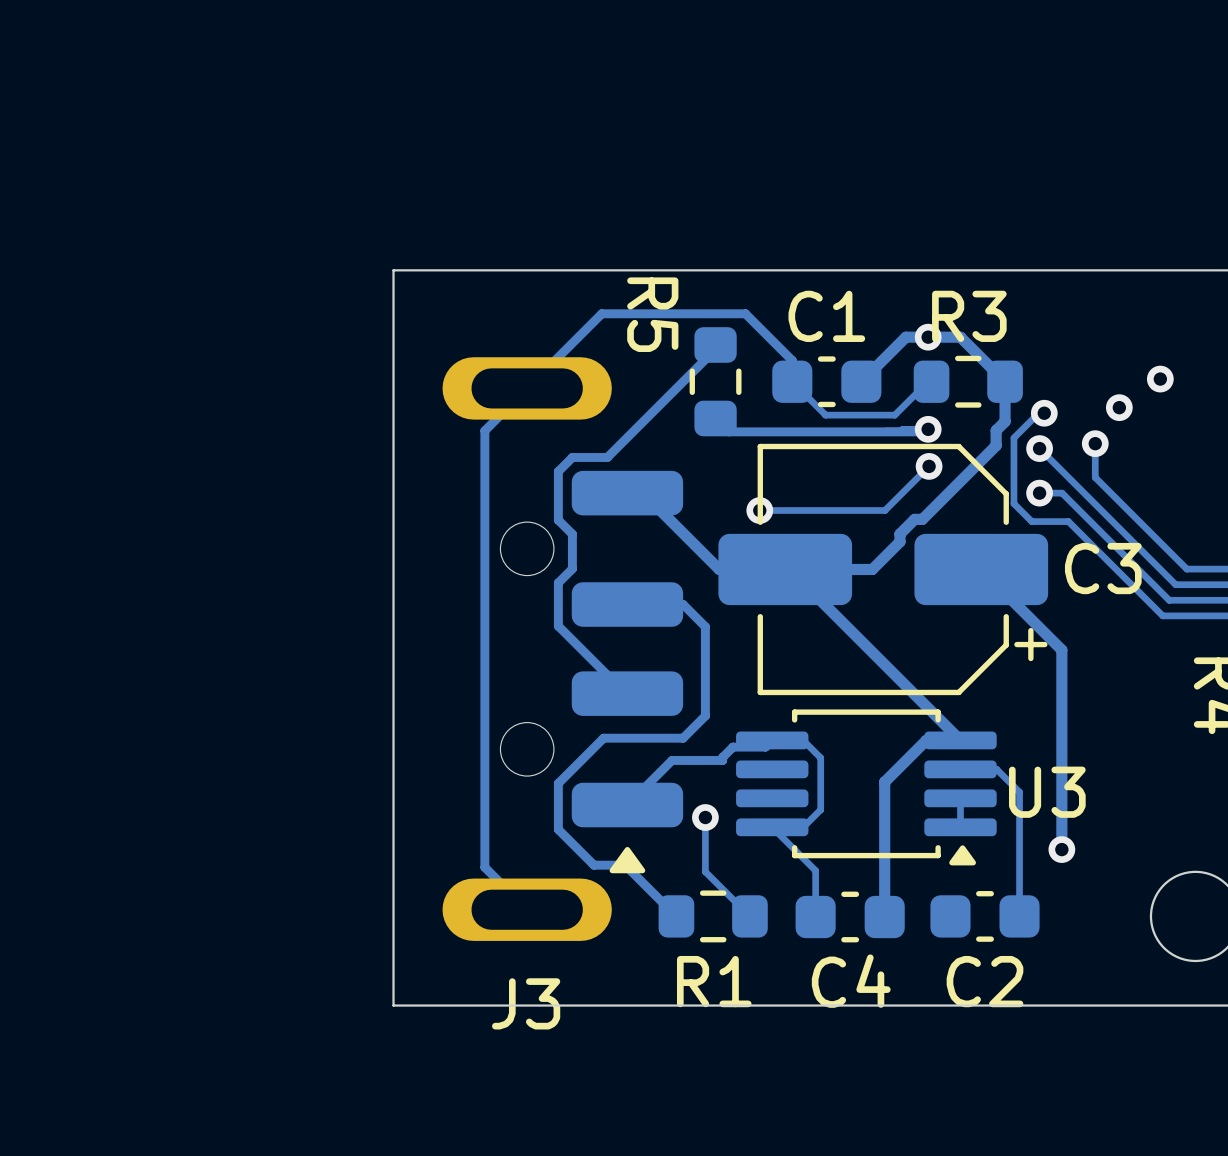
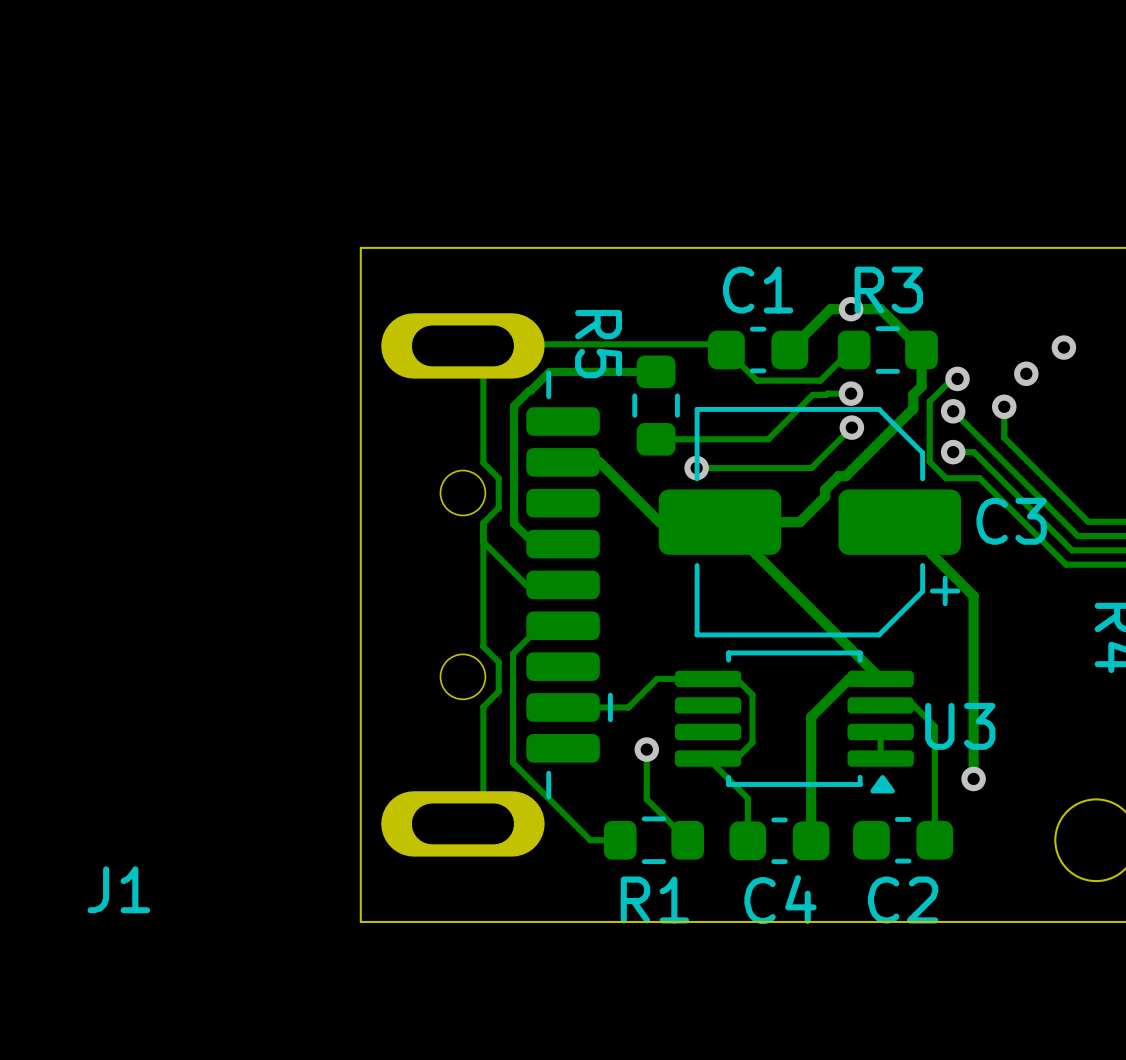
track: (715, 344) (715, 349) (607, 457) (572, 457) (558, 471) (558, 520) (572, 534) (572, 568) (558, 582) (558, 626) (627, 693) -> none
R5 position: (715, 381) -> (656, 405)
track: (792, 381) (792, 360) (745, 313) (601, 313) (484, 430) (484, 867) (527, 909) -> (726, 350) (720, 344) (464, 344) (462, 345) (483, 366) (483, 462) (498, 478) (498, 507) (483, 523) (483, 646) (498, 662) (498, 691) (483, 706) (483, 803) (462, 823)
track: none -> (656, 371) (549, 371) (514, 406) (514, 523) (534, 544) (563, 544)
track: (715, 418) (728, 431) (925, 431) (928, 429) -> none
track: none -> (812, 394) (768, 439) (656, 439)
track: none -> (483, 542) (526, 584) (563, 584) (551, 573)
track: (627, 604) (683, 604) (705, 626) (705, 715) (683, 738) (603, 738) (558, 783) (558, 829) (594, 865) (625, 865) (676, 916) -> (563, 625) (540, 625) (512, 653) (512, 762) (590, 840) (620, 840)
J1: none -> (497, 584)
J3: (562, 649) -> none
track: (772, 740) (765, 747) (732, 747) (722, 757) (722, 760) (671, 760) (627, 805) (594, 805) -> (708, 678) (657, 678) (628, 707) (563, 707)

